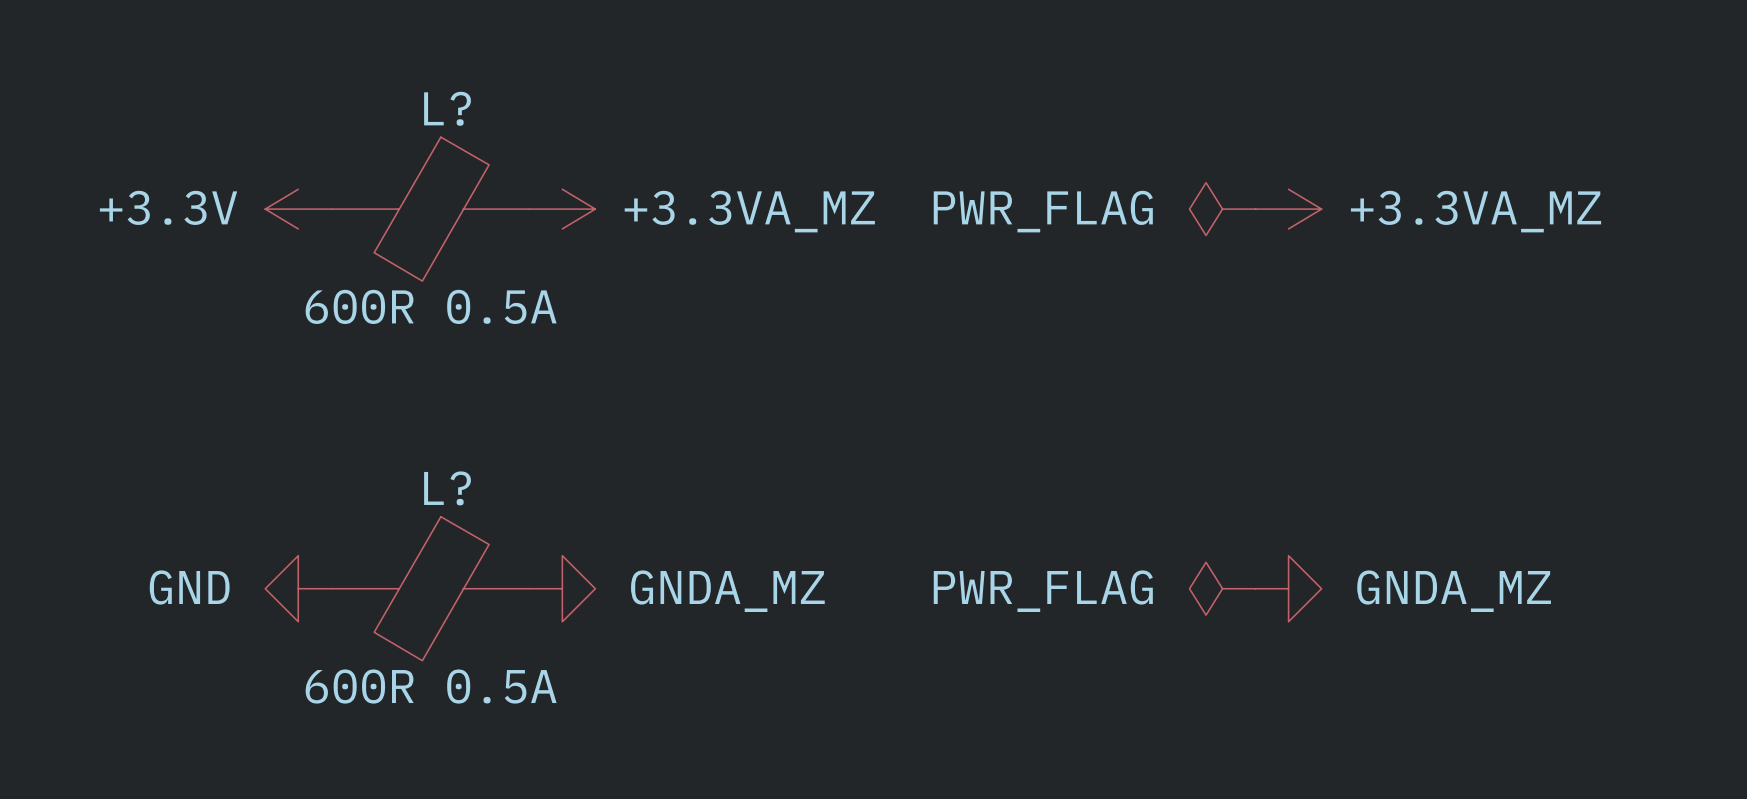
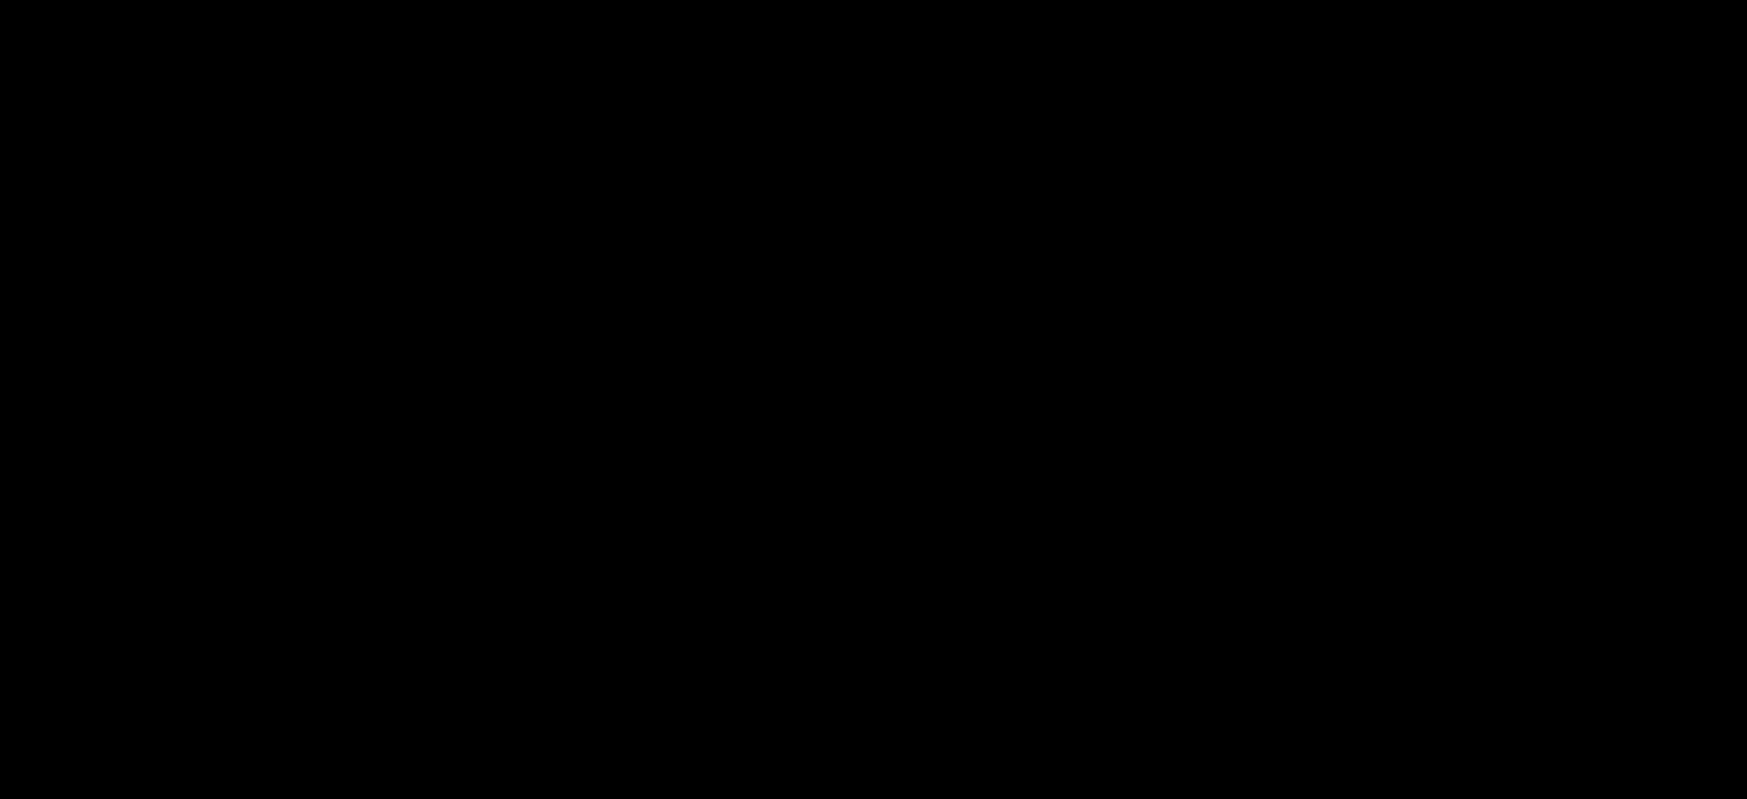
power symbol: +3.3V (298, 209) -> none
L?: 600R 0.5A (430, 209) -> none
power symbol: +3.3VA_MZ (562, 209) -> none
power symbol: PWR_FLAG (1222, 209) -> none
power symbol: +3.3VA_MZ (1288, 209) -> none
power symbol: GND (298, 588) -> none
L?: 600R 0.5A (430, 588) -> none
power symbol: GNDA_MZ (562, 588) -> none
power symbol: PWR_FLAG (1222, 588) -> none
power symbol: GNDA_MZ (1288, 588) -> none

